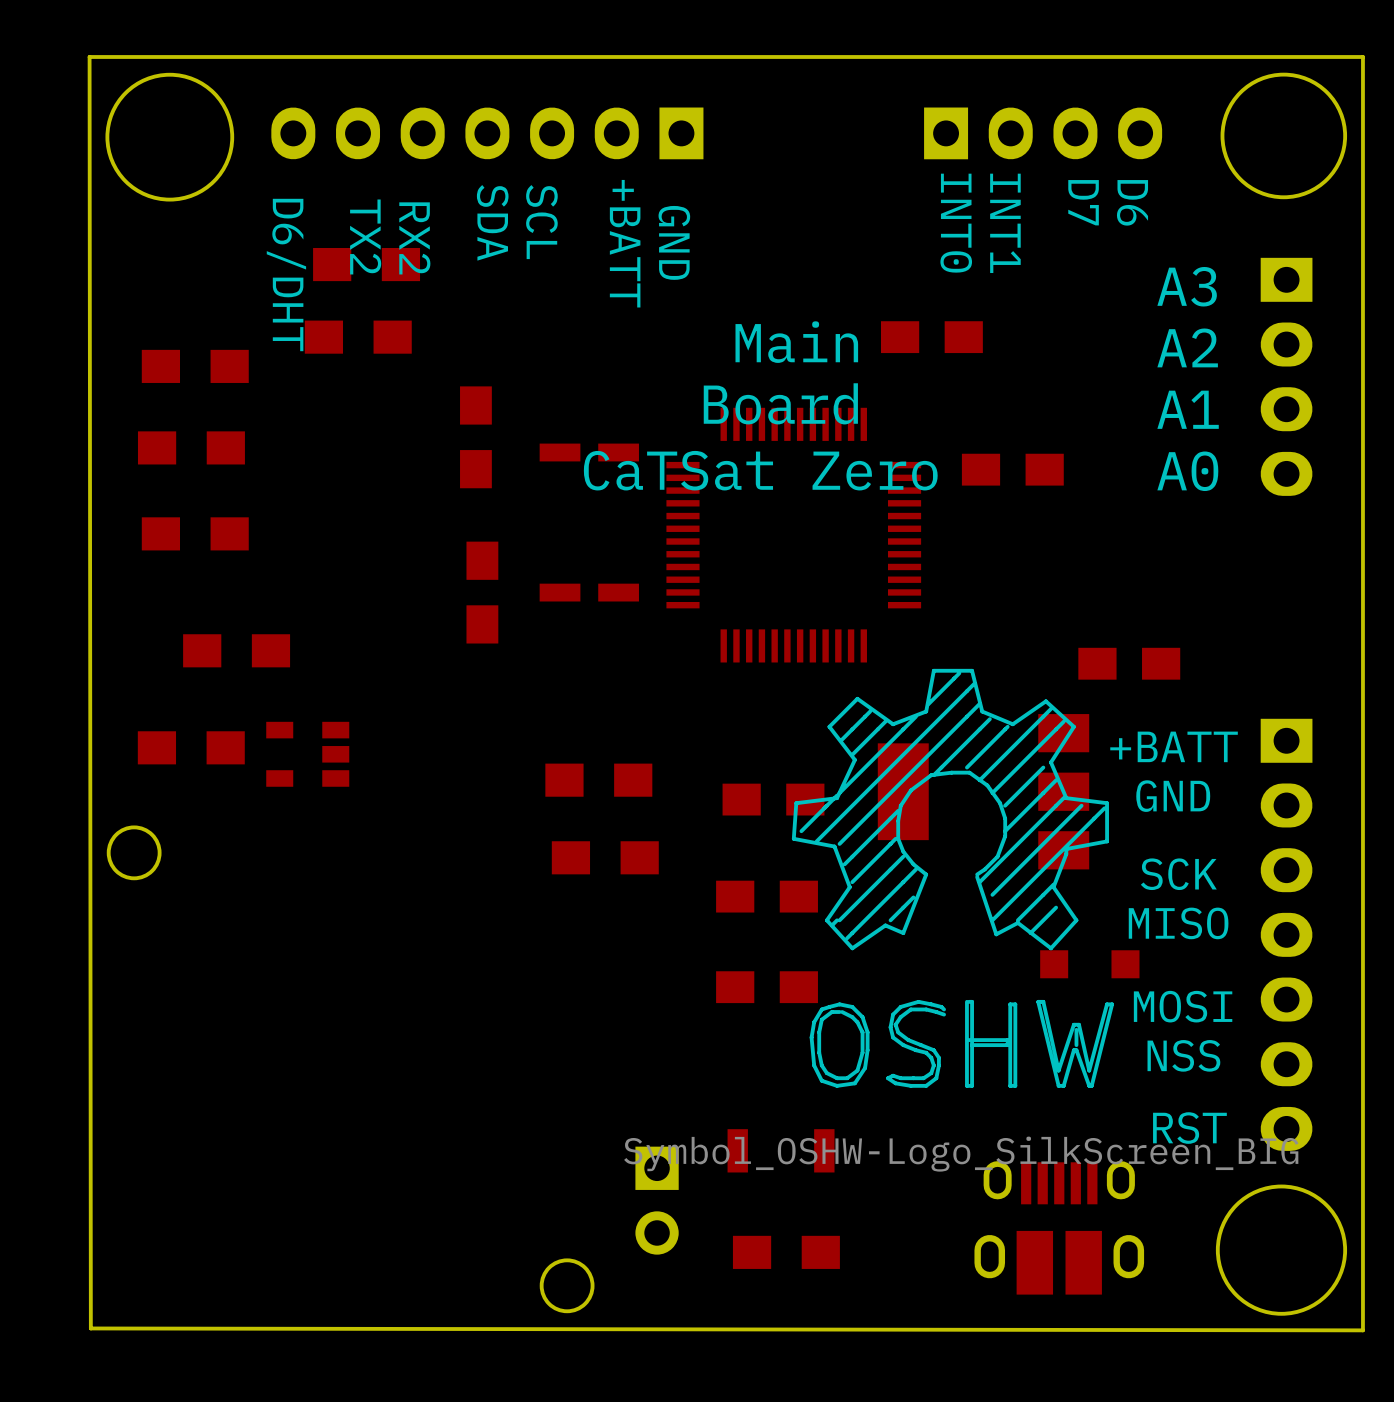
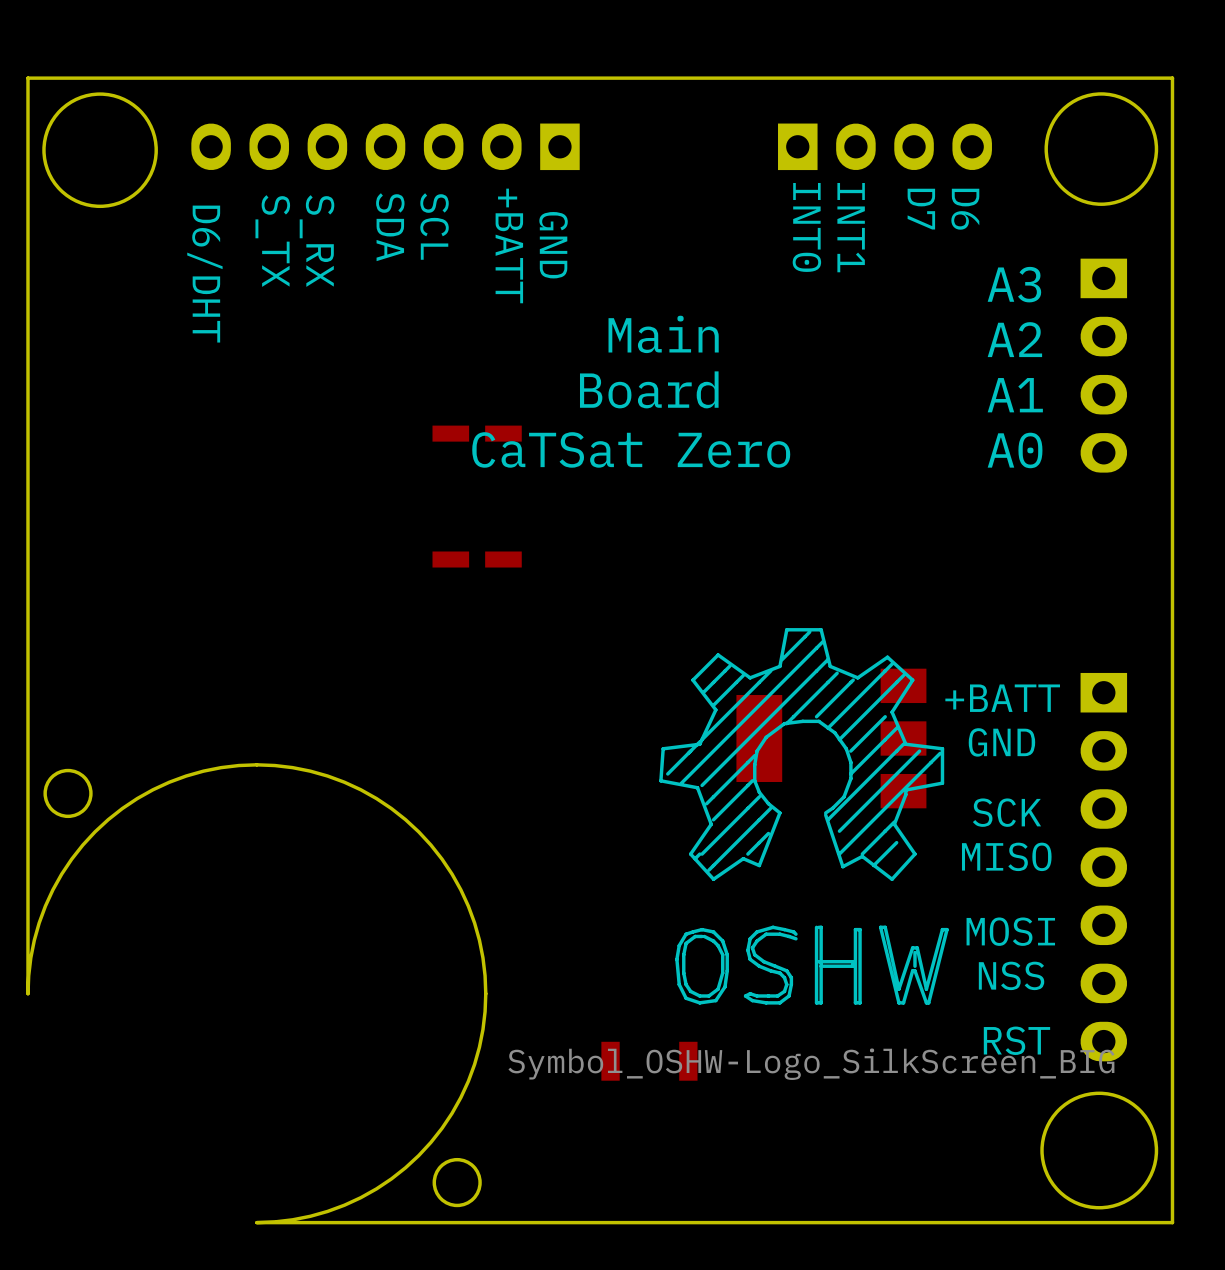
board edge: (89, 56) (90, 1328) (1362, 1330) -> (27, 78) (27, 993) (34, 940) (52, 889) (82, 845) (108, 819) (152, 789) (203, 771) (256, 764) (310, 771) (344, 782) (376, 798) (405, 819) (442, 859) (460, 889) (474, 922) (485, 975) (485, 1011) (474, 1064) (460, 1097) (430, 1142) (405, 1167) (376, 1188) (344, 1205) (292, 1219) (256, 1222) (1172, 1222)
text: TX2 (365, 236) -> S_TX (272, 241)
text: RX2 (414, 238) -> S_RX (316, 241)
part: (366, 264) -> none
part: (358, 337) -> none
part: (931, 337) -> none
part: (195, 366) -> none
part: (475, 437) -> none
part: (191, 447) -> none
part: (1012, 469) -> none
part: (195, 533) -> none
part: (793, 535) -> none
part: (482, 592) -> none
part: (236, 650) -> none
part: (1129, 663) -> none
part: (191, 747) -> none
part: (307, 754) -> none
part: (598, 780) -> none
part: (773, 799) -> none
part: (605, 857) -> none
part: (767, 896) -> none
part: (1089, 964) -> none
part: (767, 987) -> none
part: (657, 1200) -> none
part: (1059, 1227) -> none
part: (786, 1252) -> none

